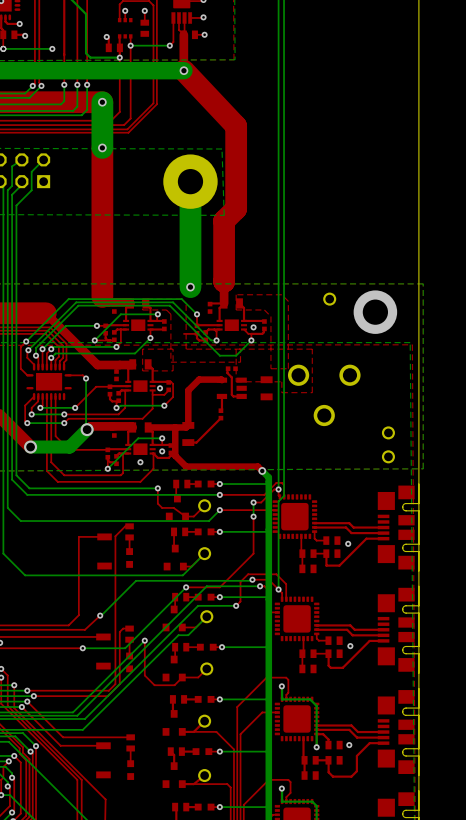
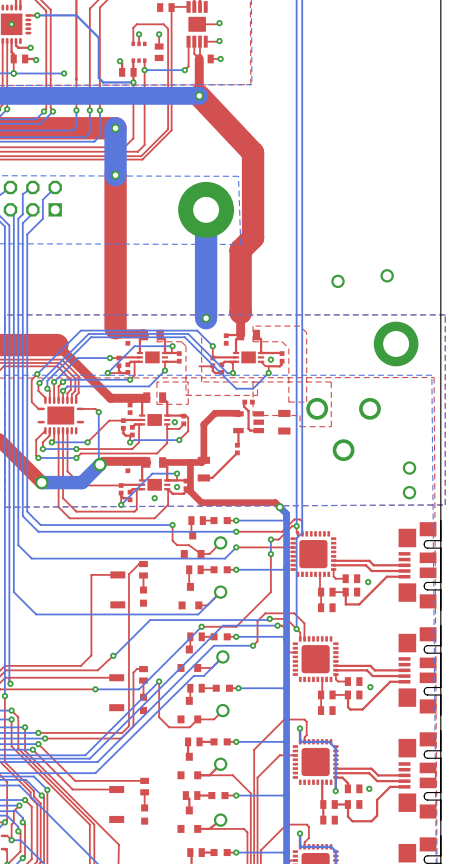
part: none -> (387, 275)
part: none -> (337, 281)
part: (329, 299) -> none

